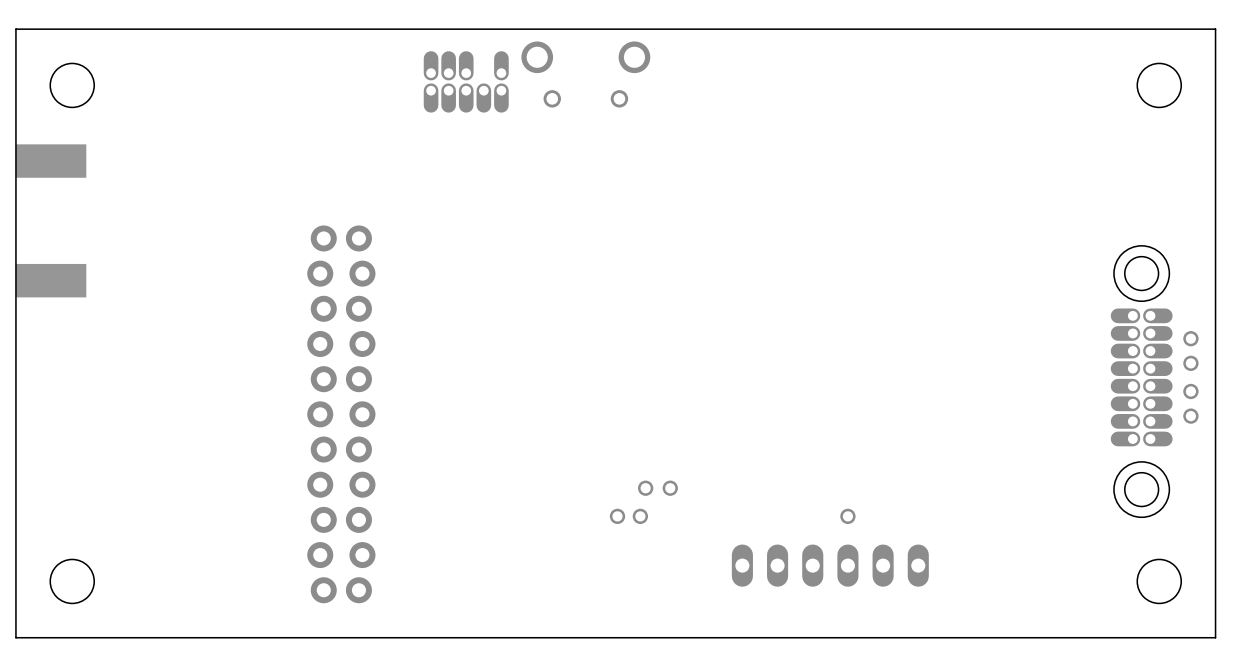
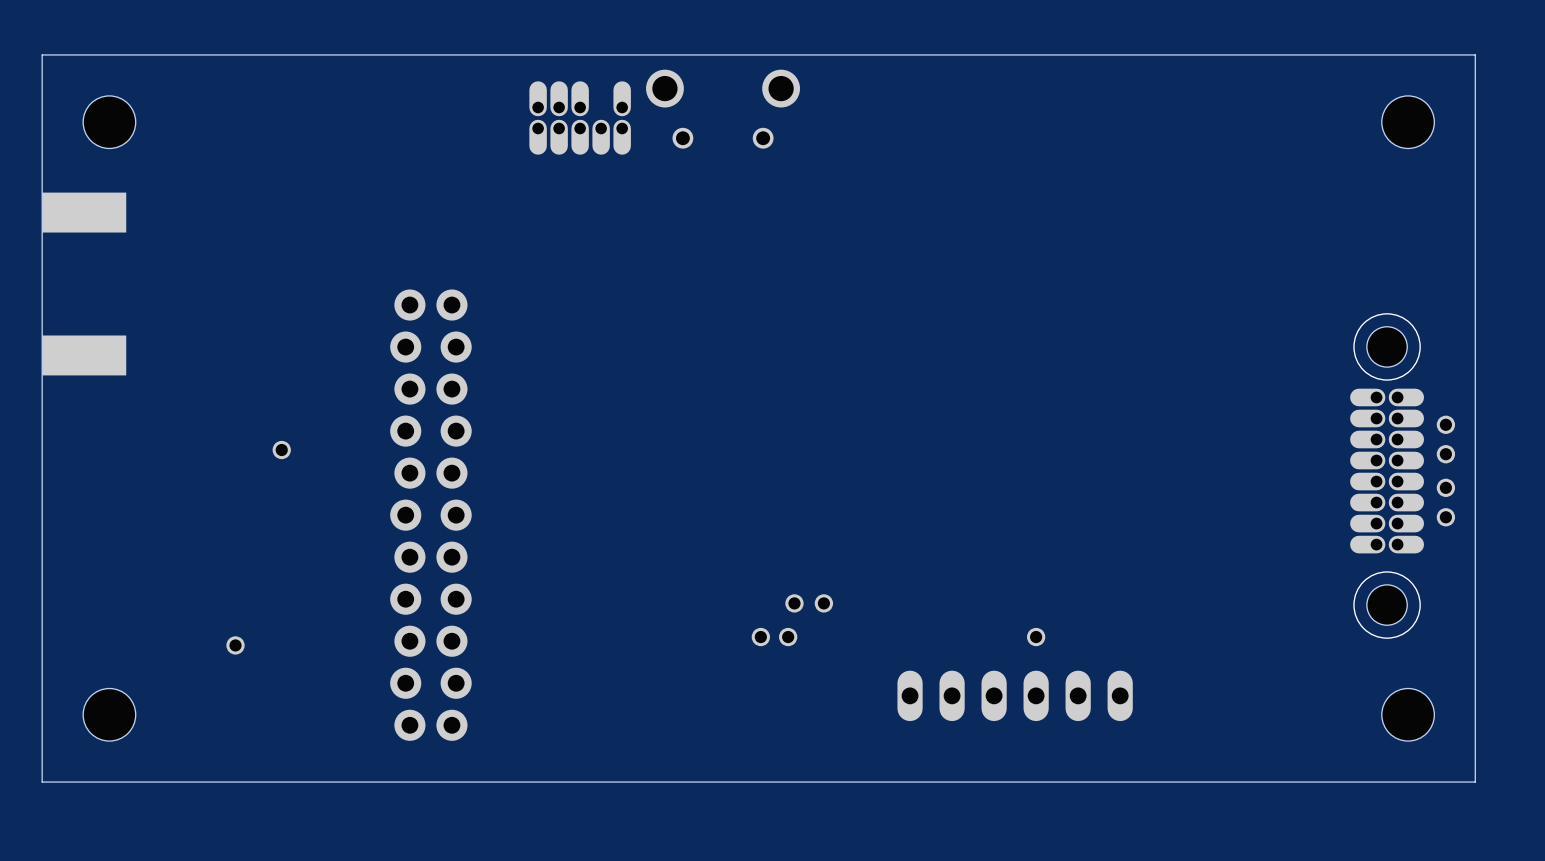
part: none -> (281, 450)
part: none -> (235, 645)

